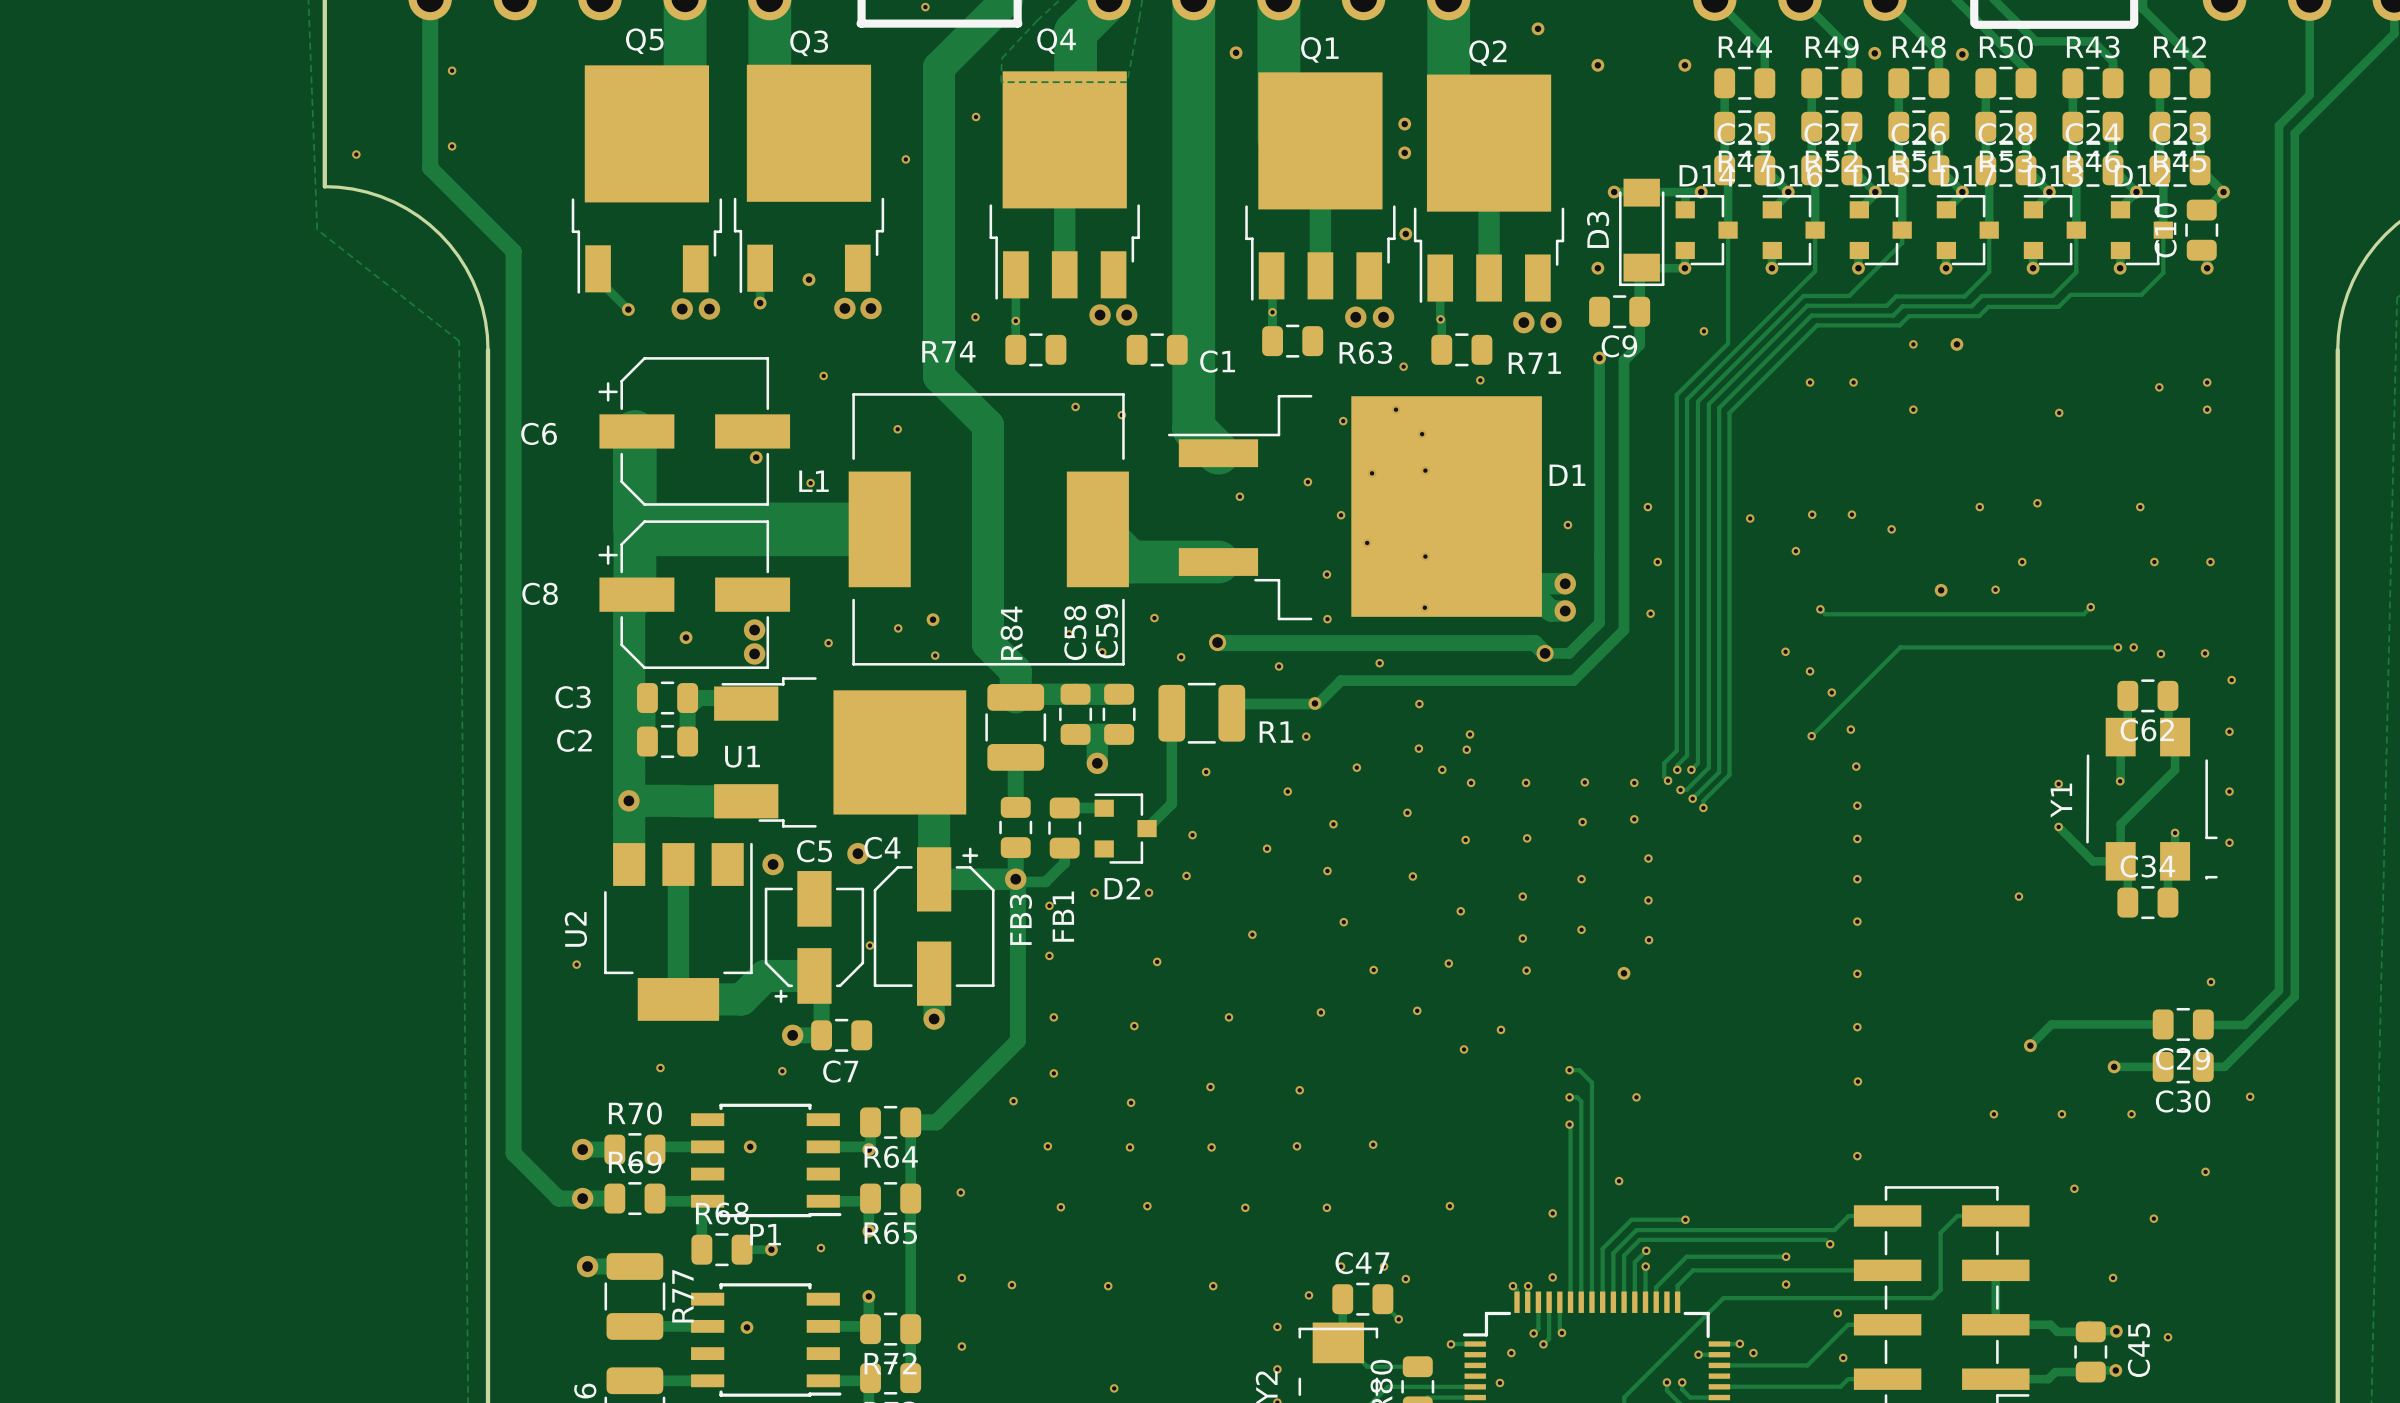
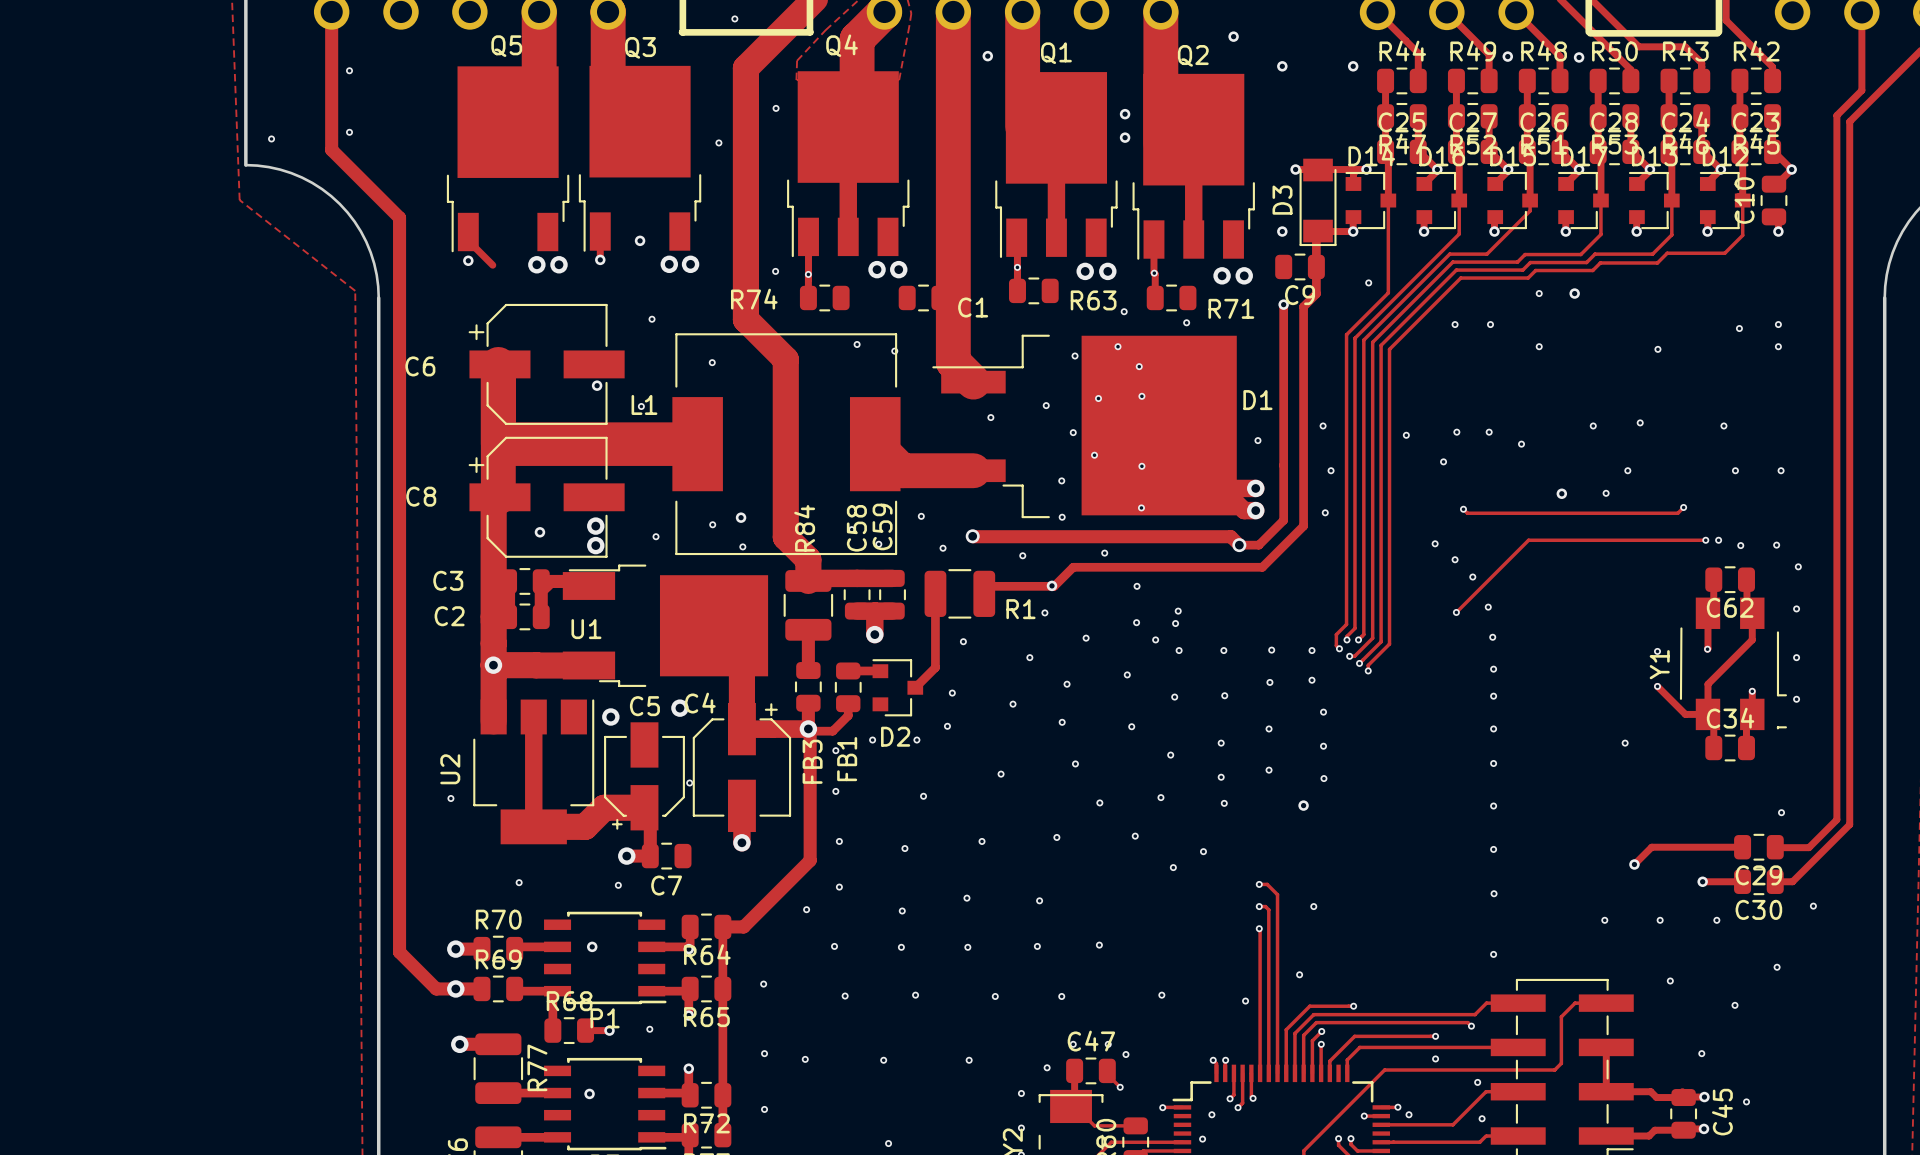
via: (1405, 233) -> none
via position: (628, 309) -> (468, 260)
via: (1552, 1277) -> none

